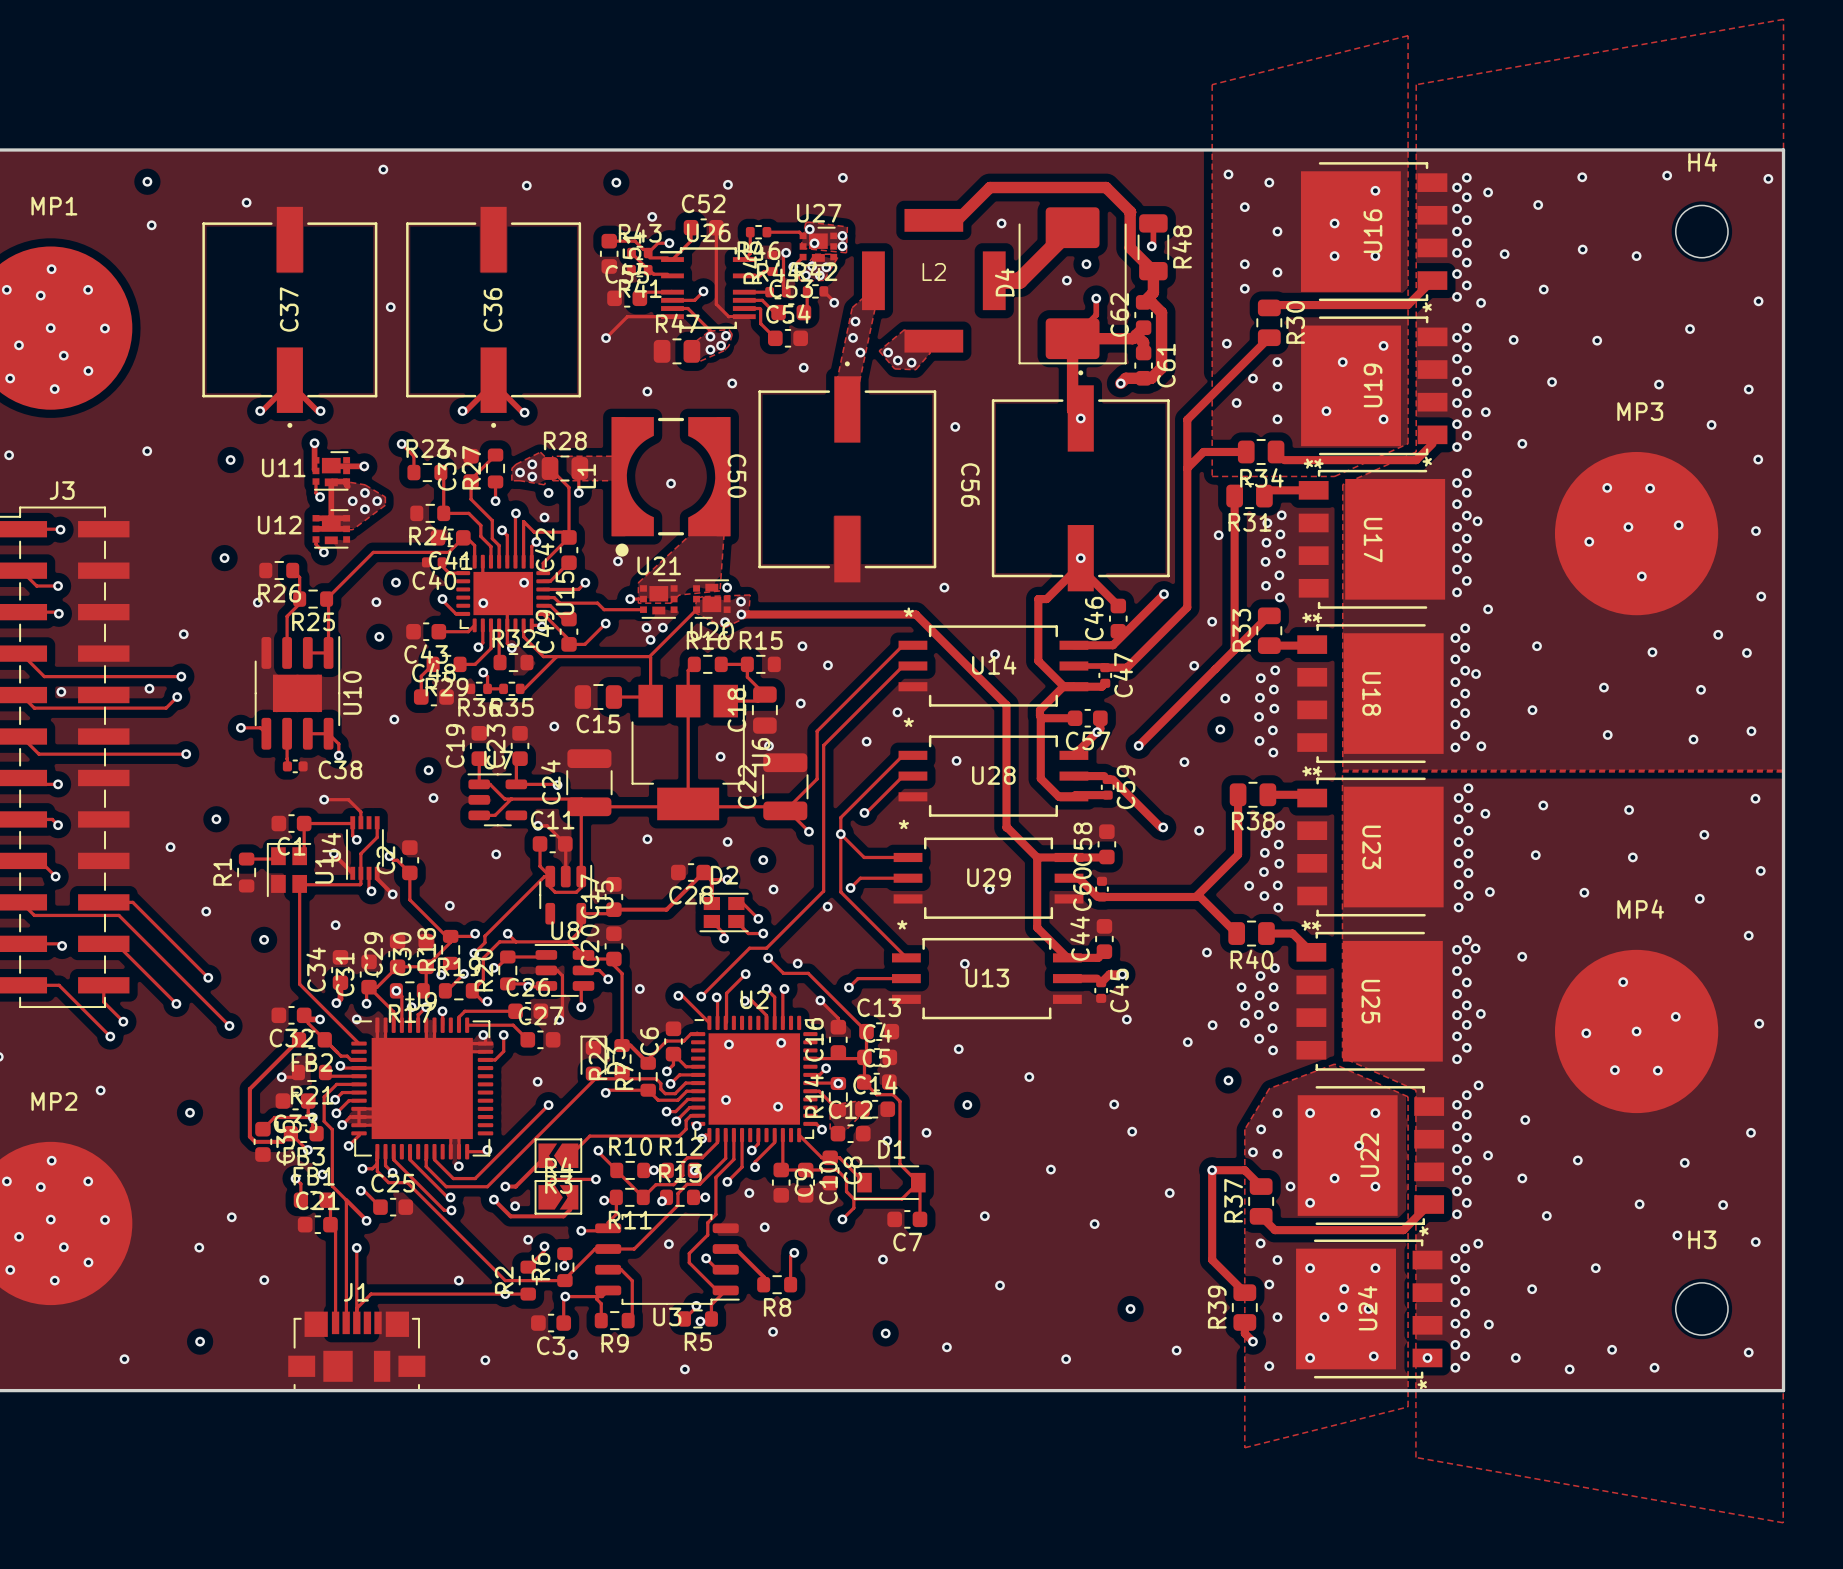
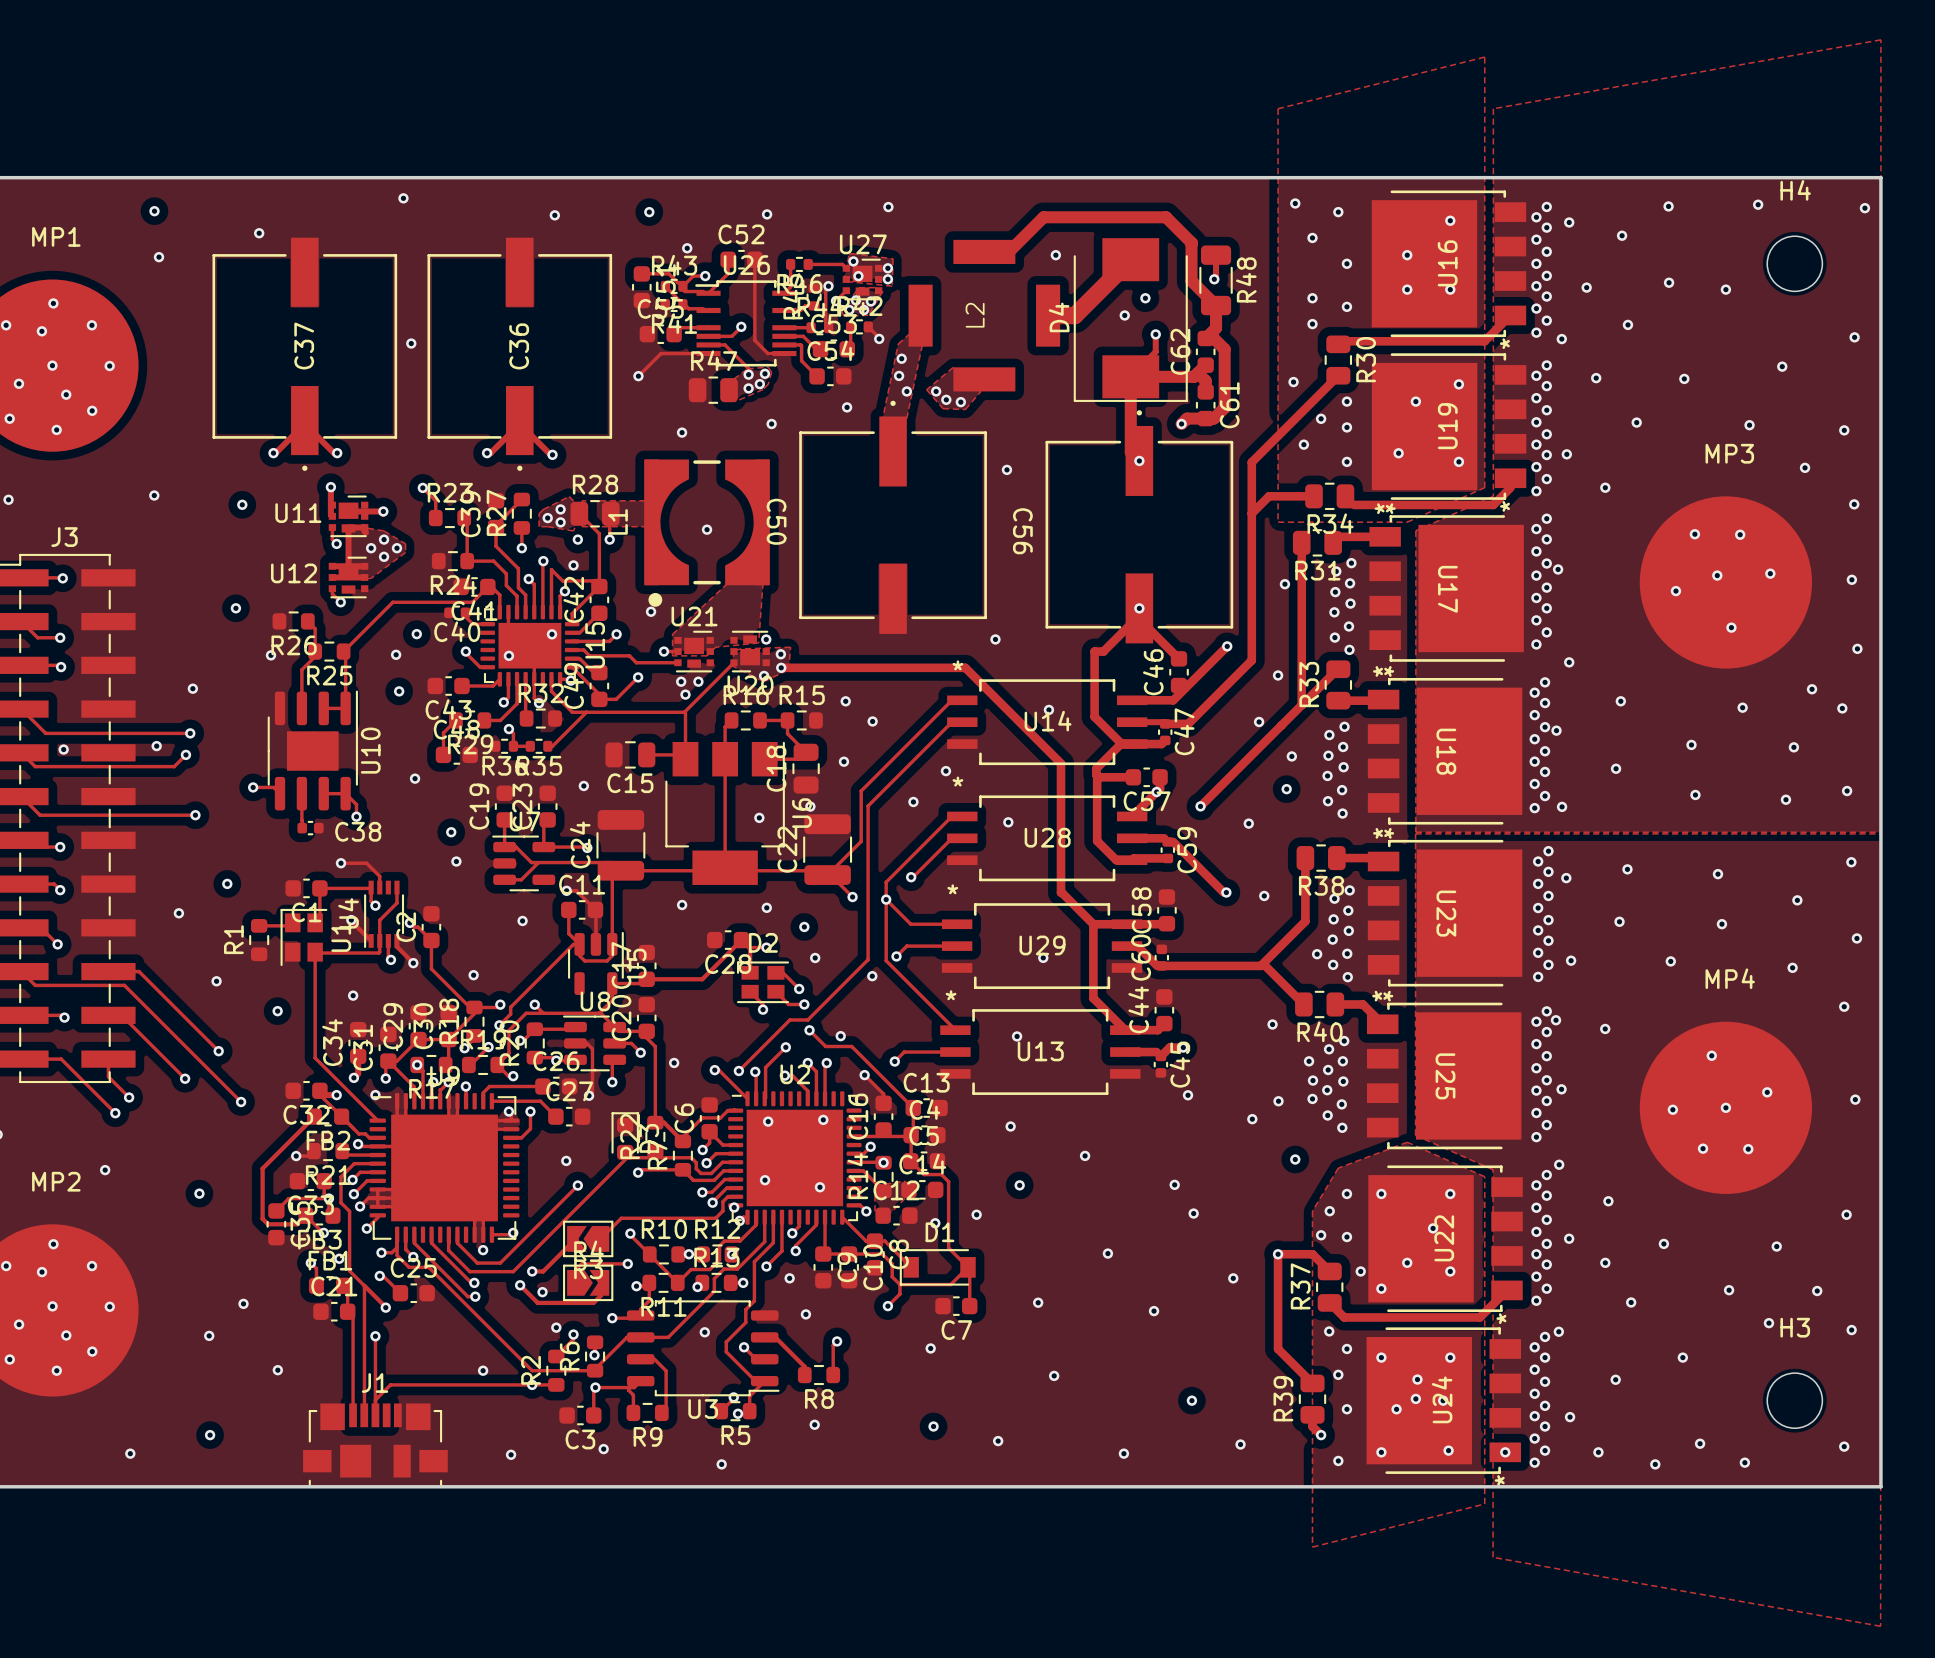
D4 footprint: [1018, 207, 1127, 365] -> [1073, 238, 1188, 402]
L2 name rotation: 0° (934, 271) -> 90° counterclockwise (975, 315)

